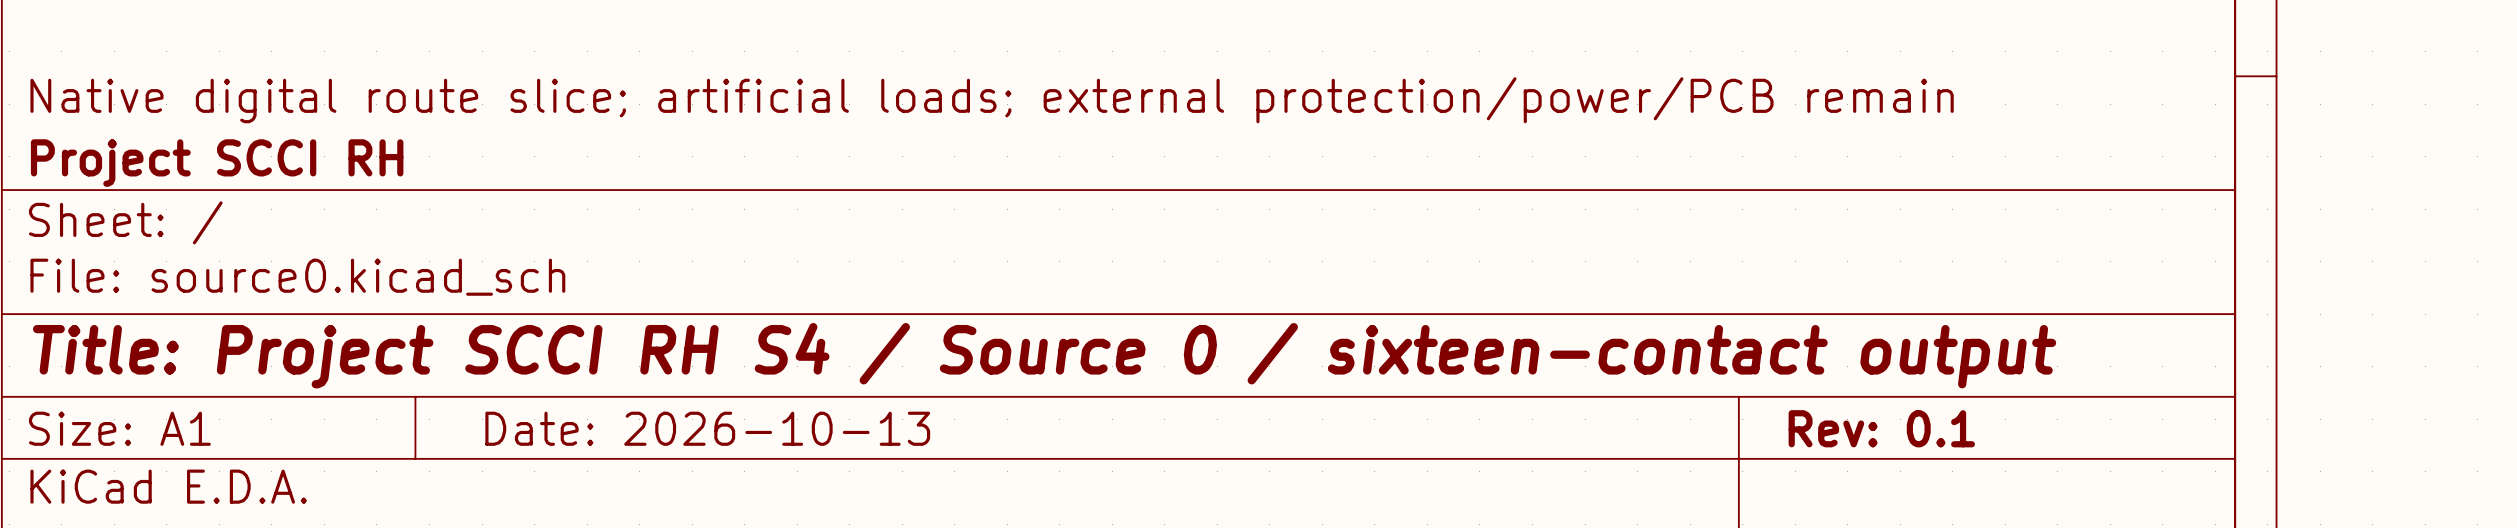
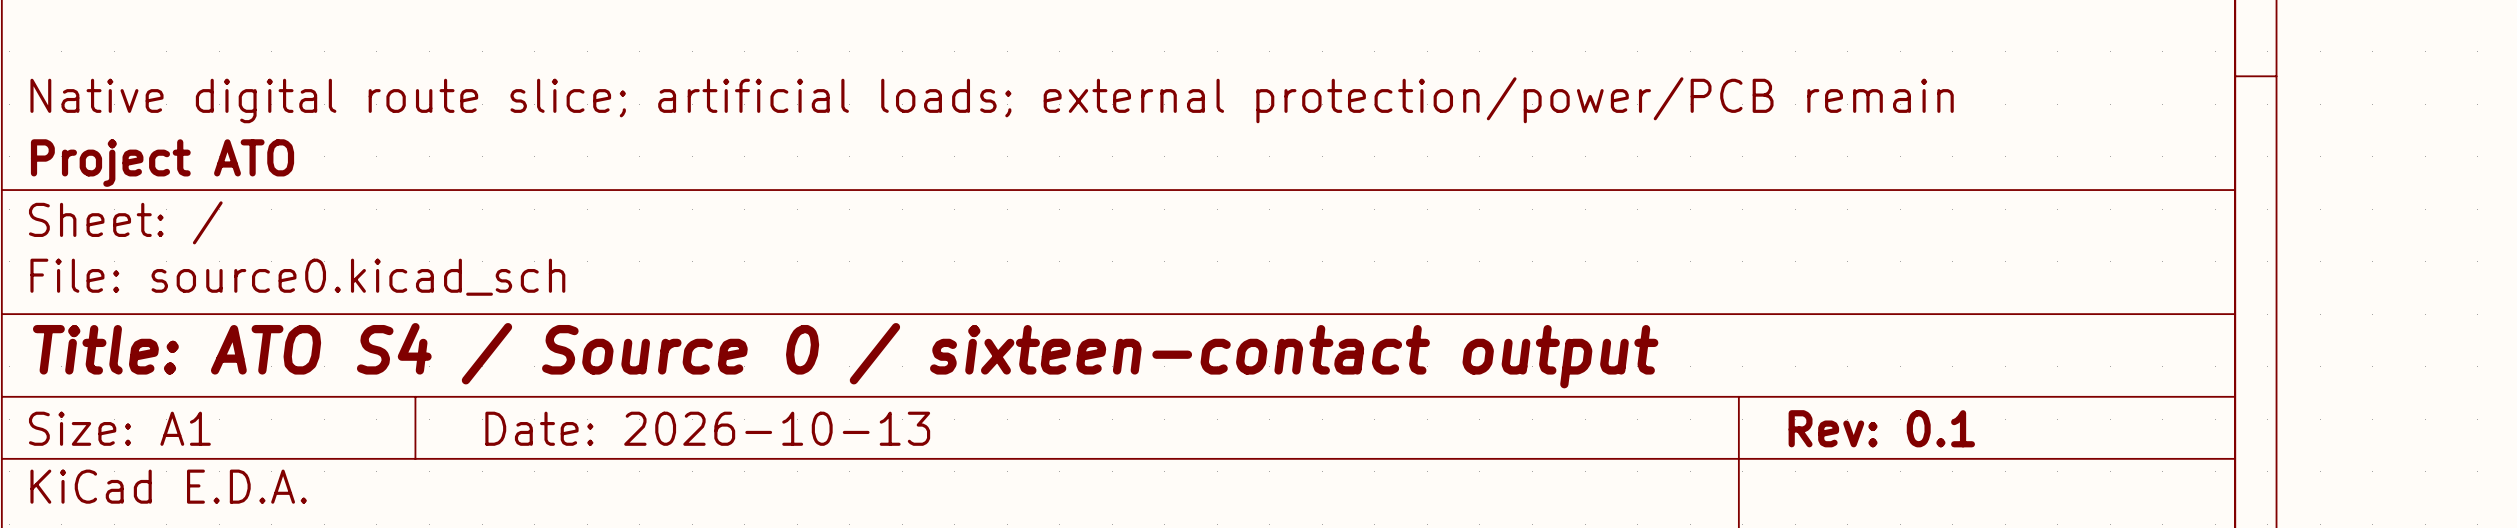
title block: Project SCCI RH (217, 163) -> Project ATO (162, 163)
title block: Title: Project SCCI RH S4 / Source 0 / sixteen-contact output (1044, 355) -> Title: ATO S4 / Source 0 / sixteen-contact output (845, 355)

